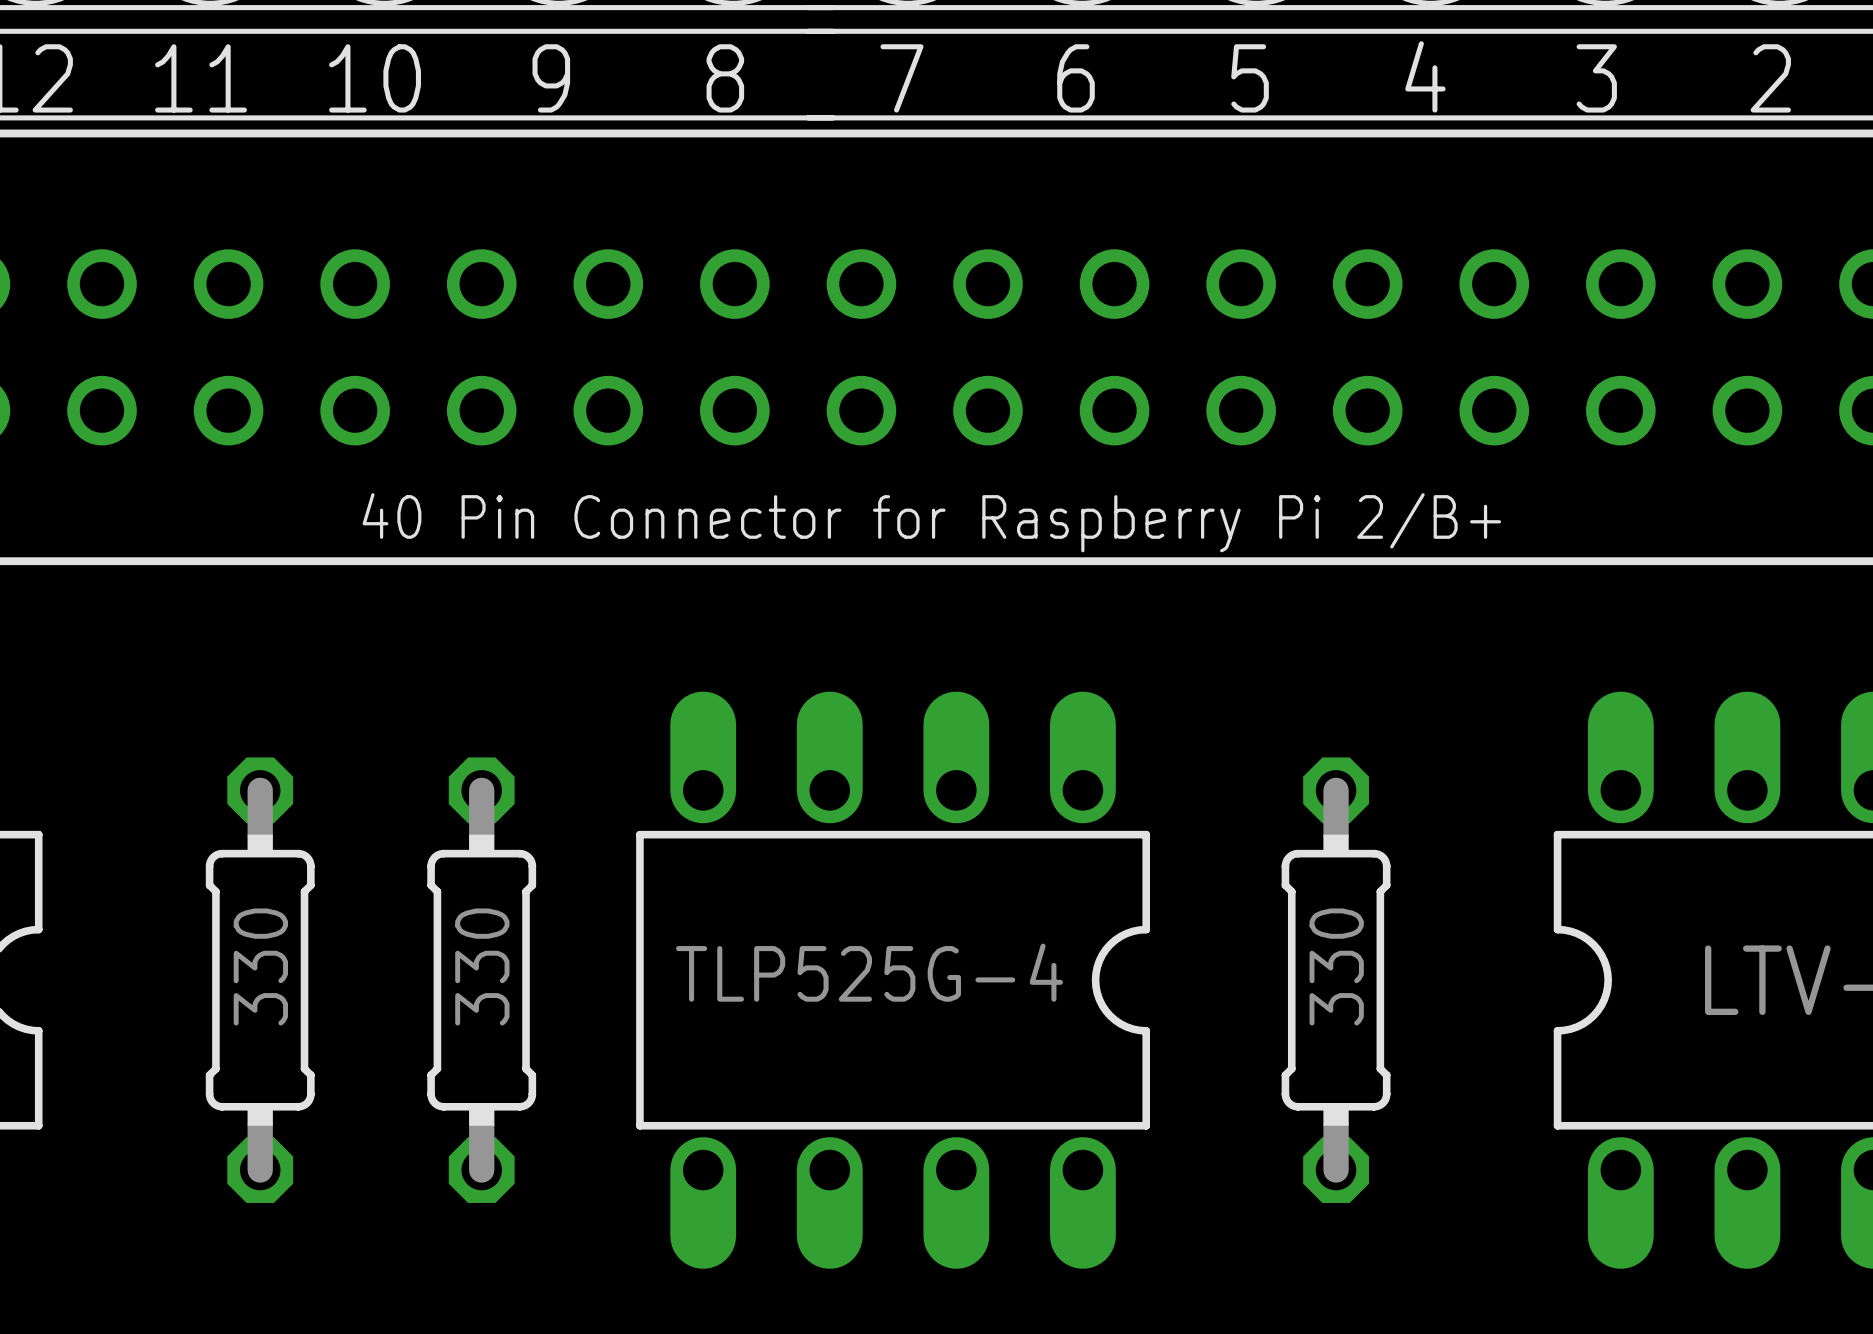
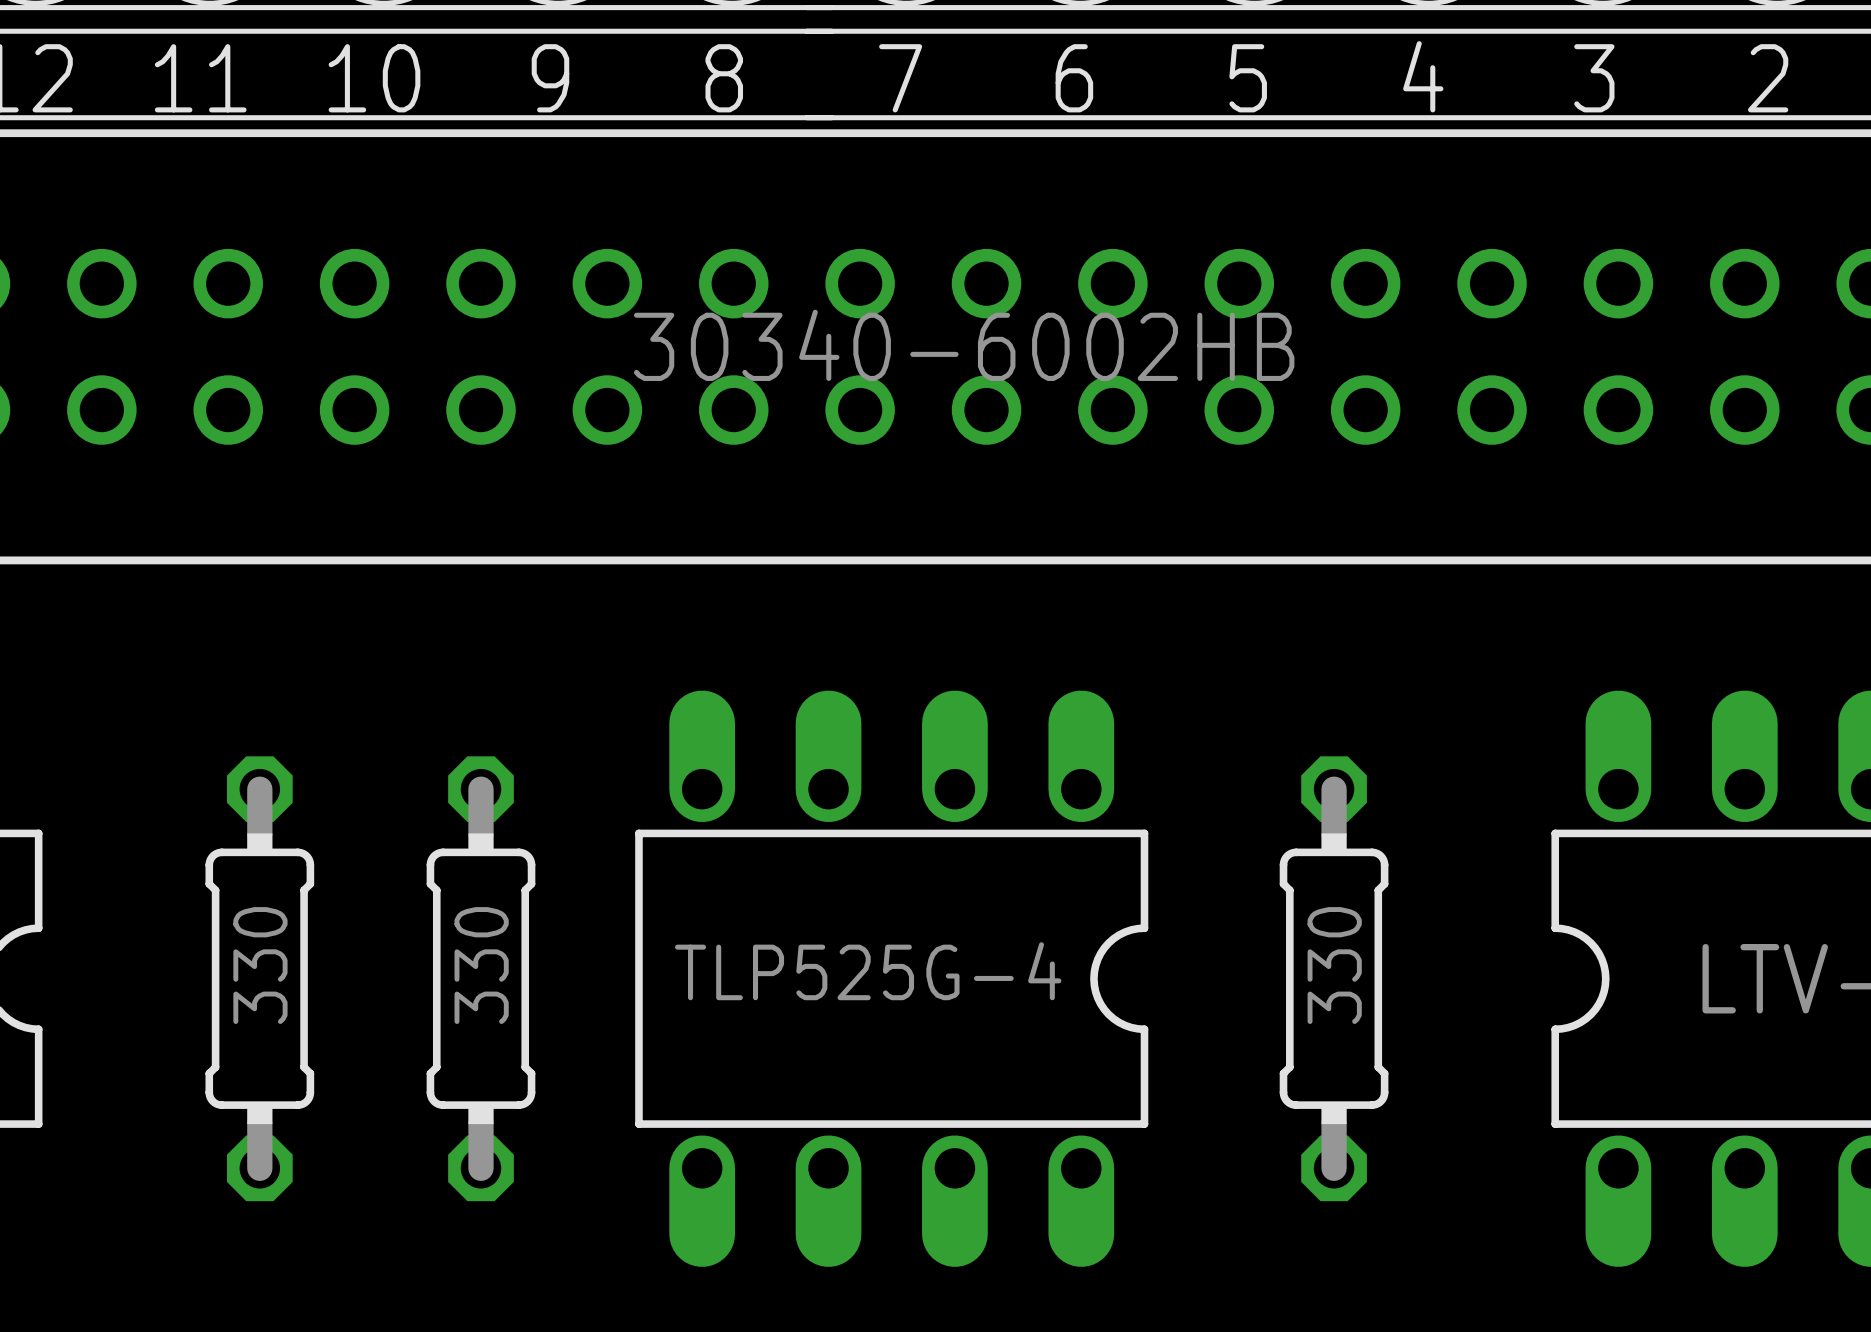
part value: none -> 30340-6002HB (964, 345)
text: 40 Pin Connector for Raspberry Pi 2/B+ (931, 522) -> none

